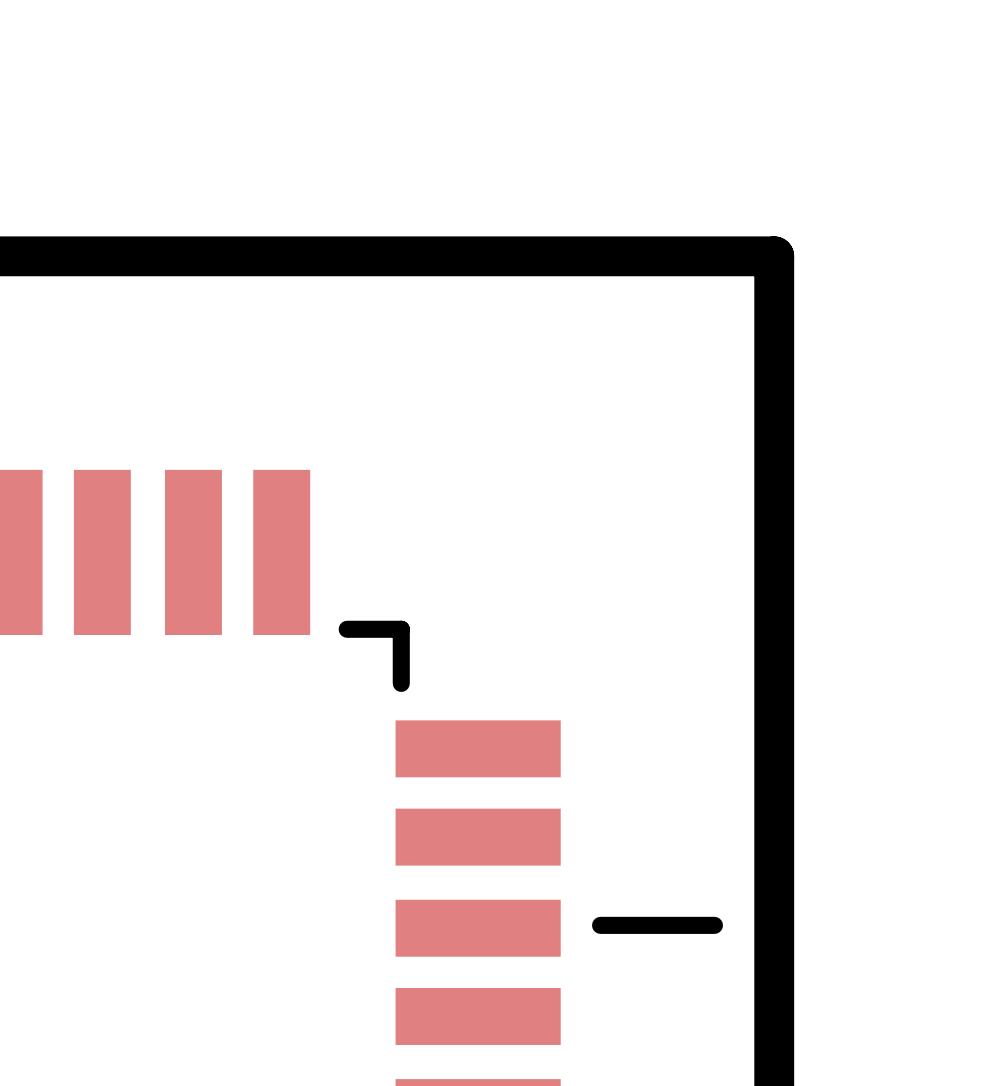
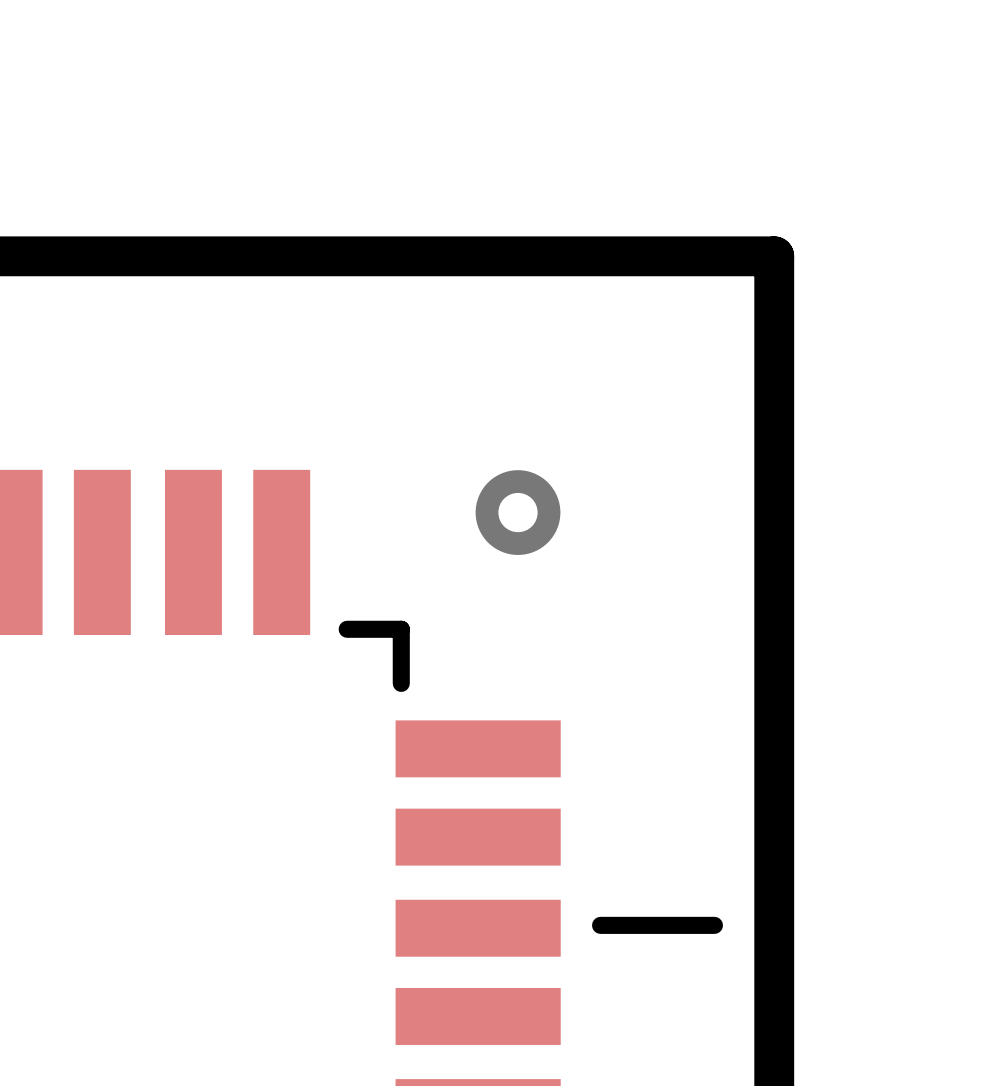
via: none -> (518, 512)

